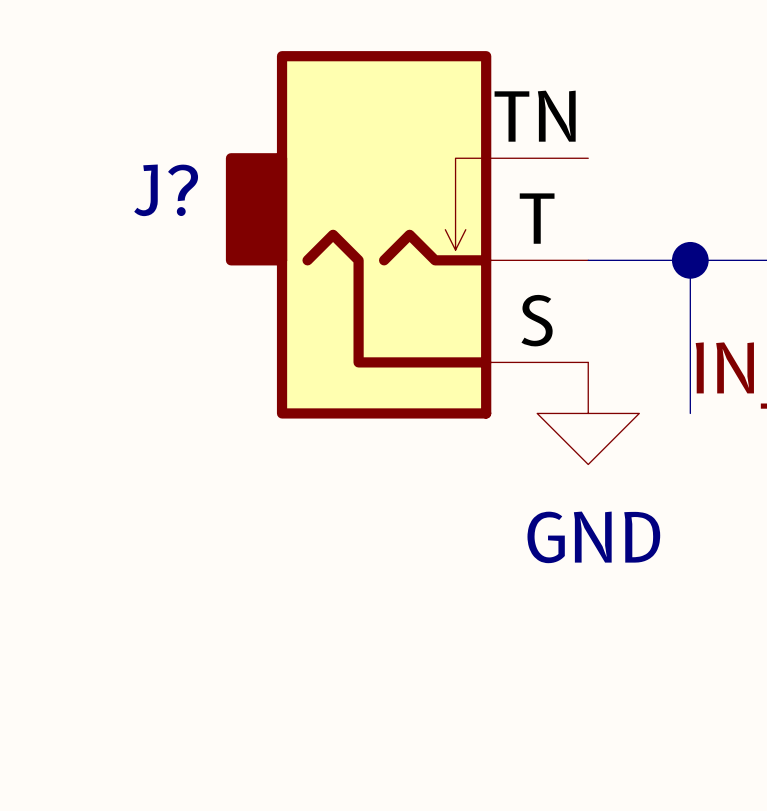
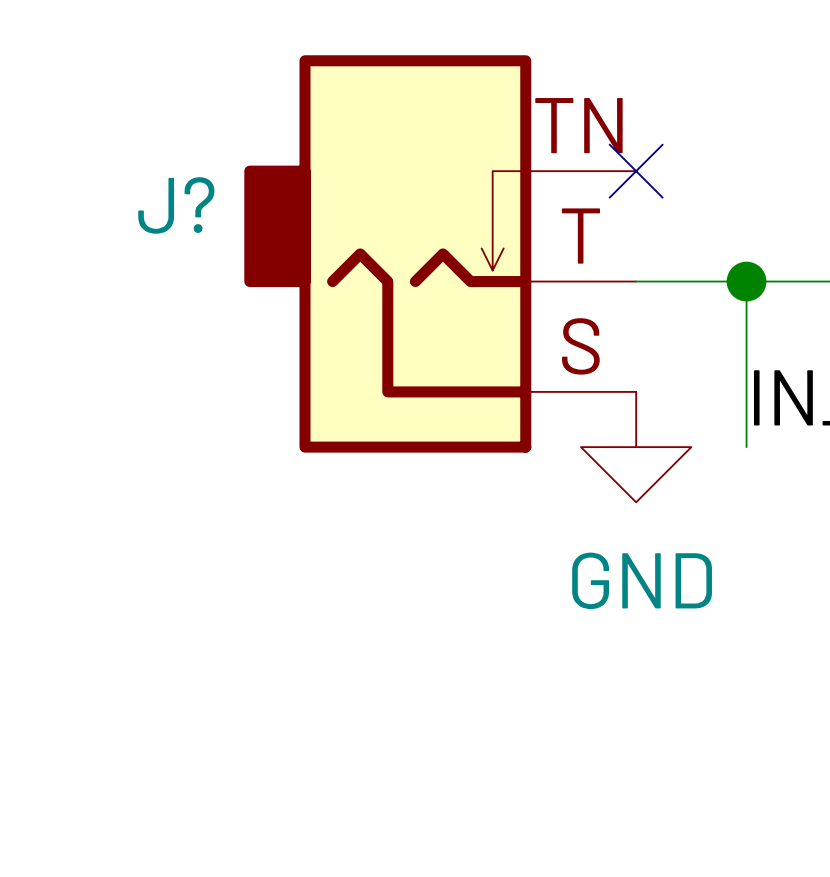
no-connect mark: none -> (636, 171)

